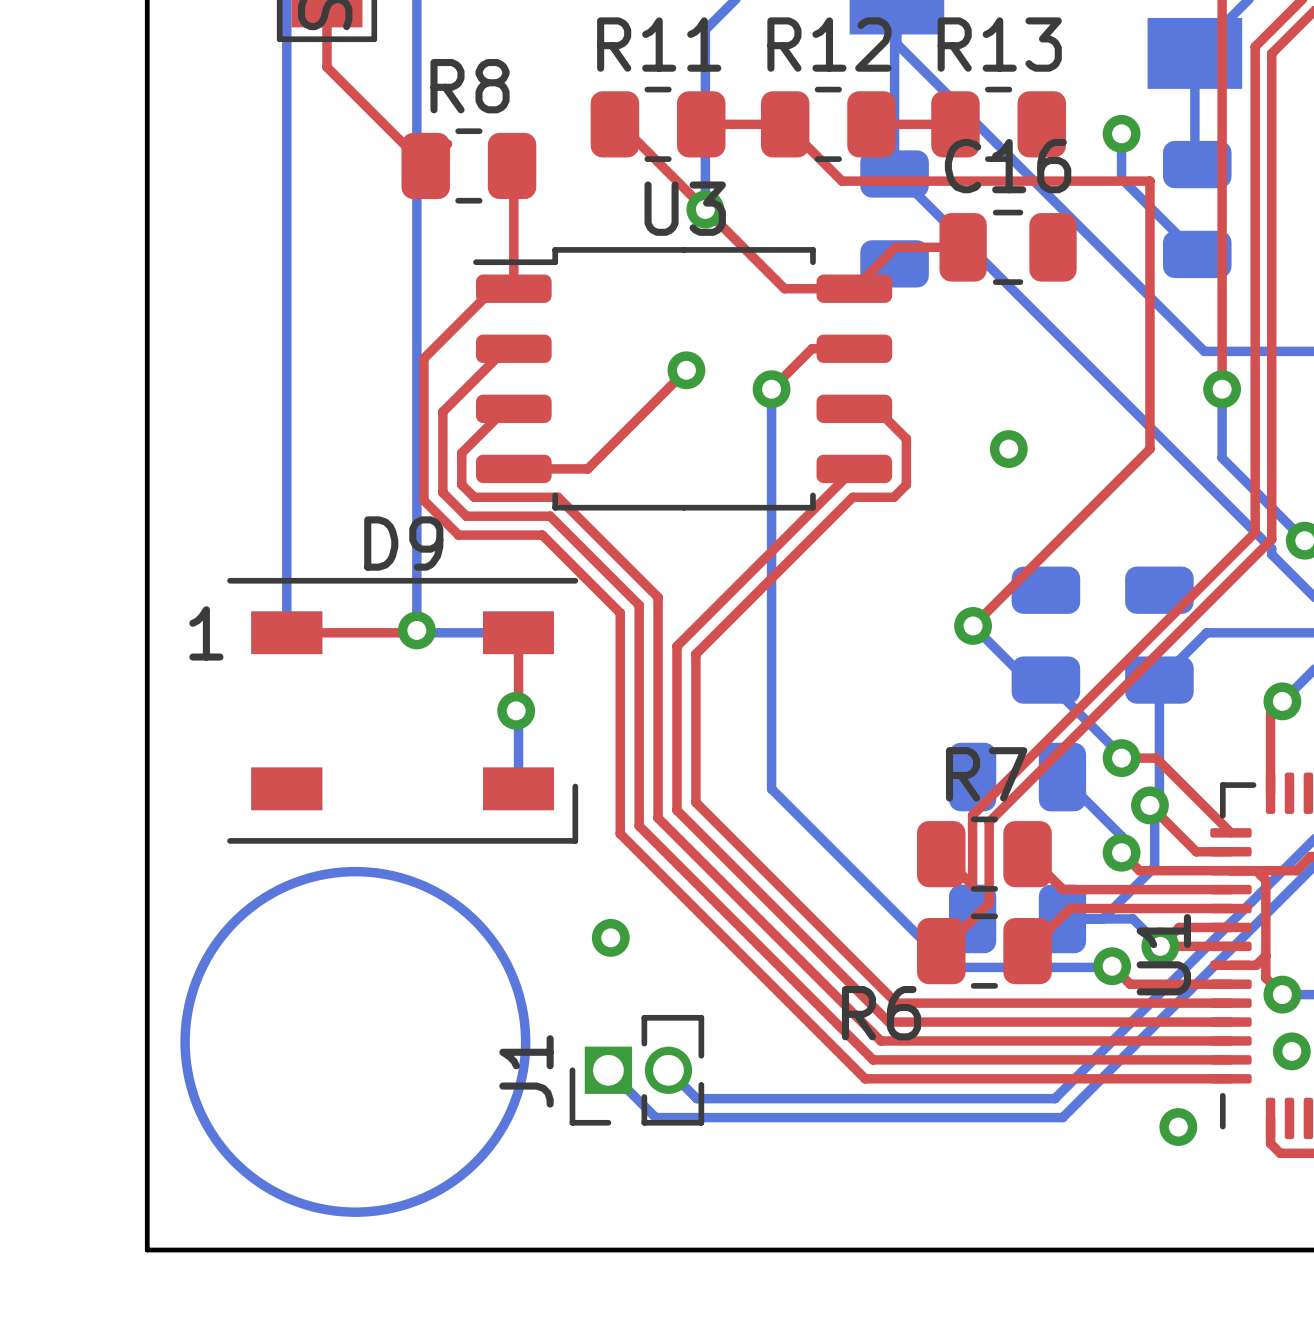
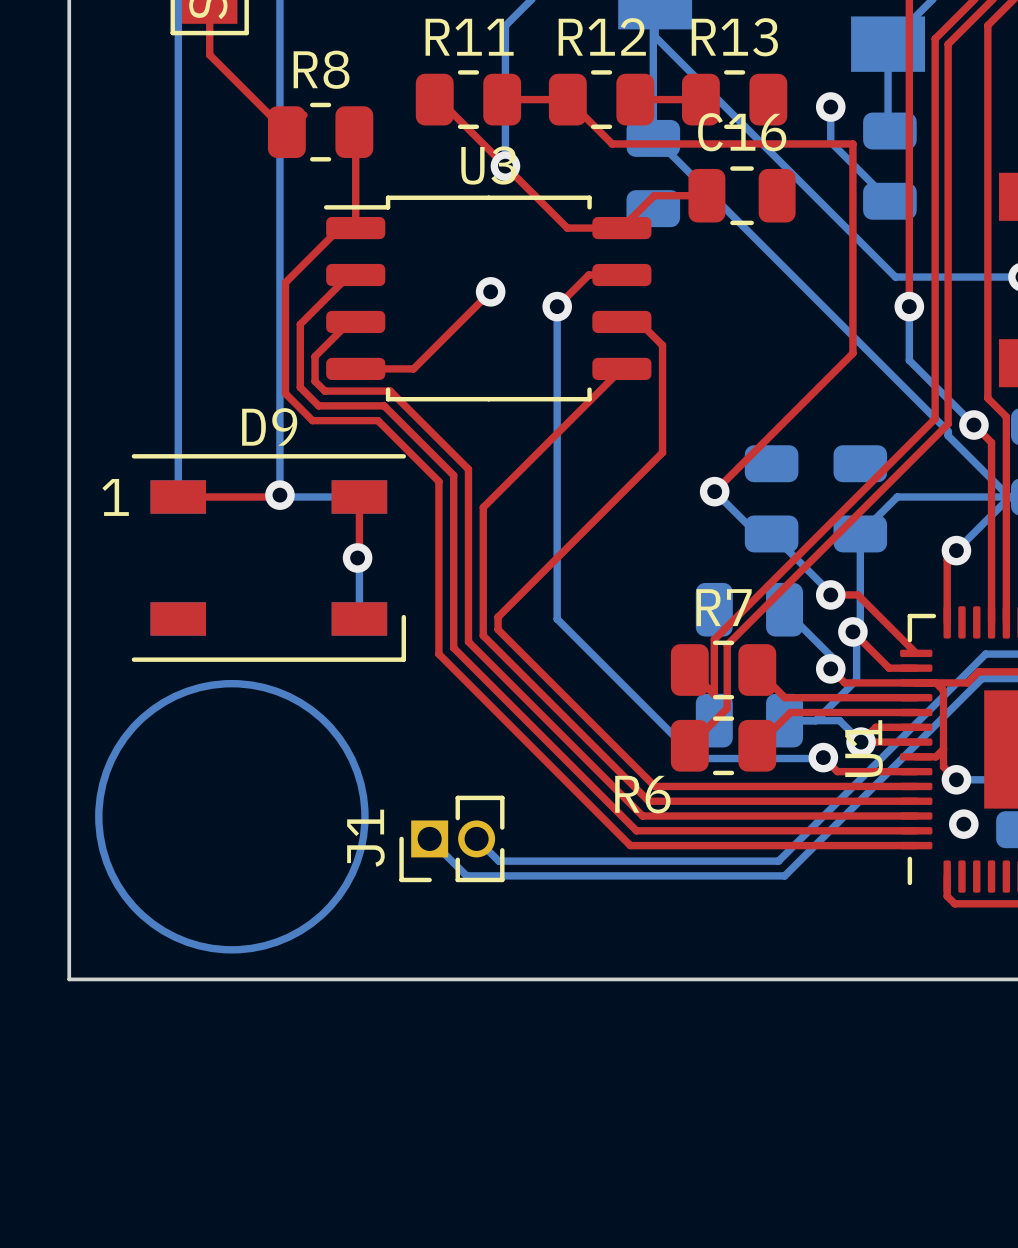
via: (1008, 449) -> none
top track: (906, 484) (893, 497) (852, 497) (695, 654) (695, 786) -> (662, 381) (662, 452) (498, 617)
via: (610, 937) -> none
via: (1178, 1127) -> none

